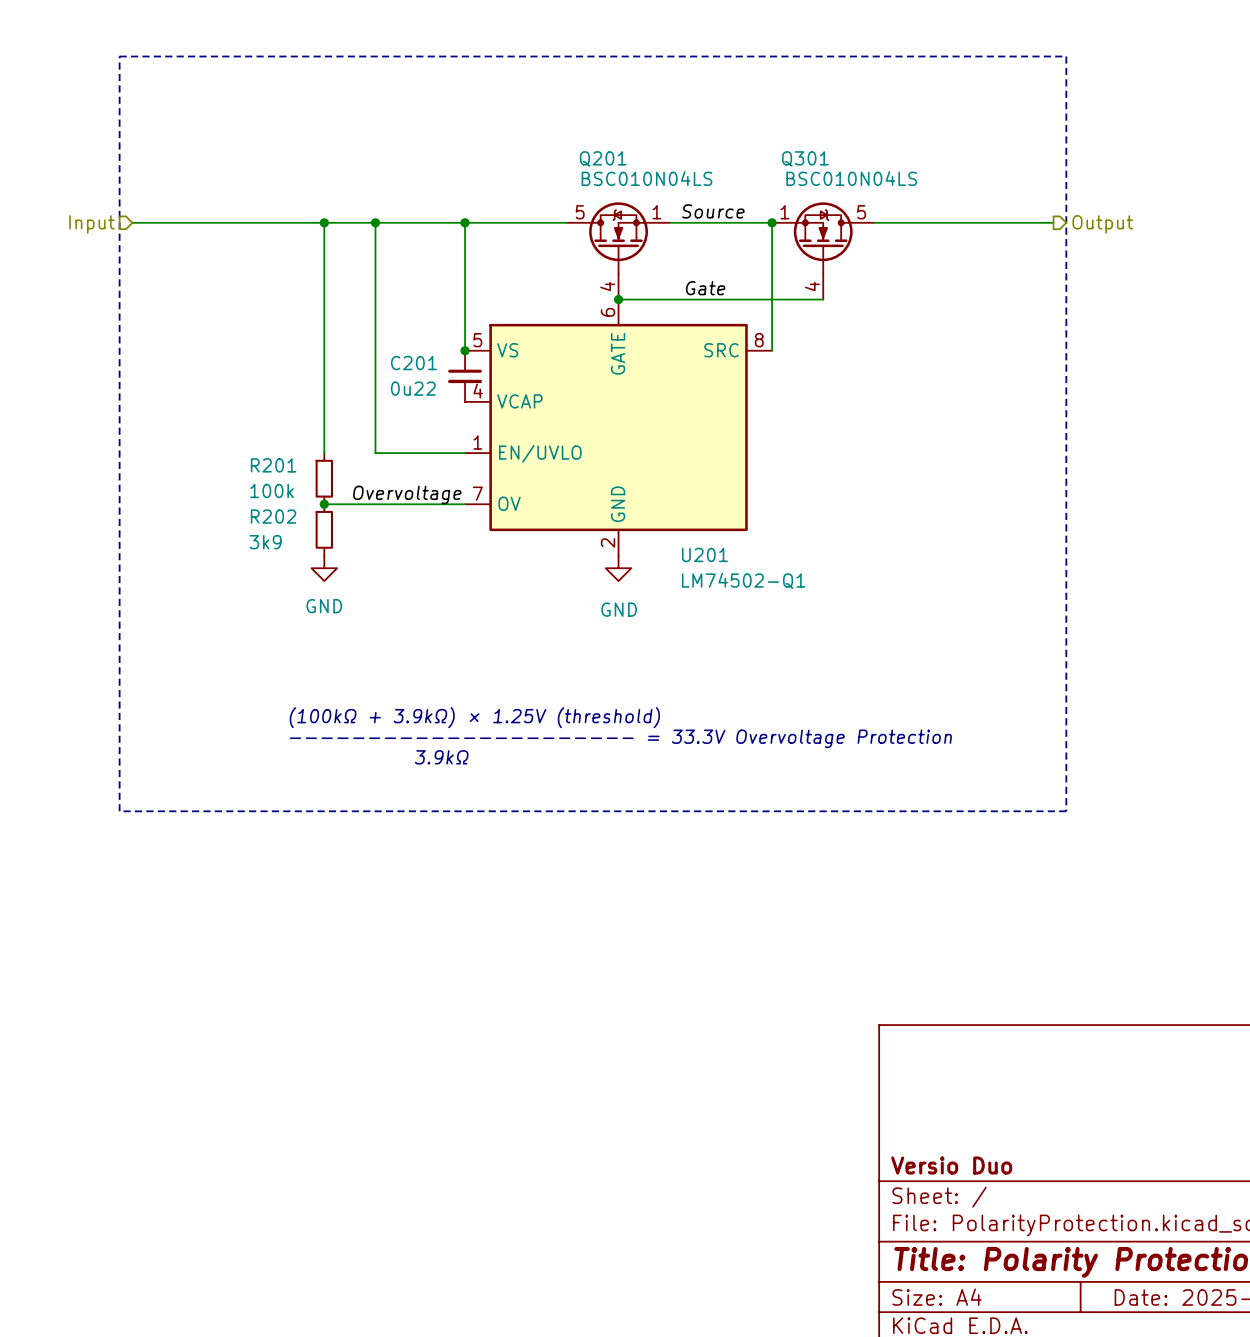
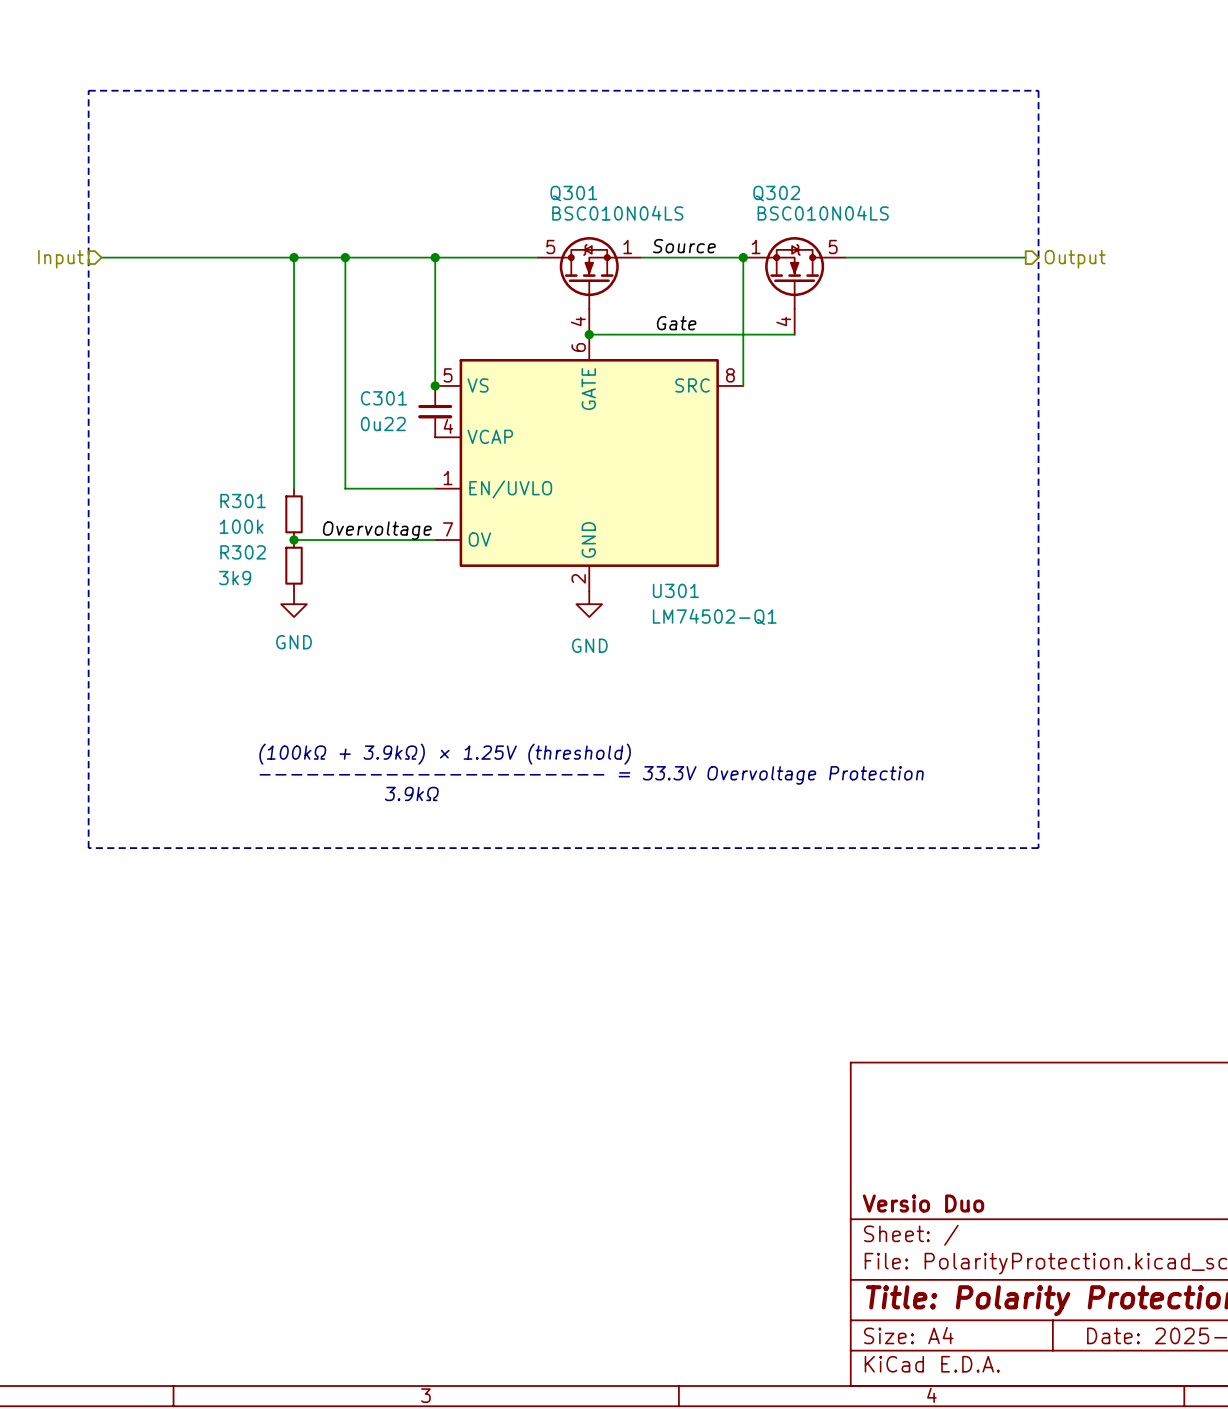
Q201 name: Q201 (603, 158) -> Q301 (573, 193)
Q301 name: Q301 (805, 158) -> Q302 (776, 193)
C201 name: C201 (413, 363) -> C301 (383, 398)
R201 name: R201 (273, 465) -> R301 (243, 501)
R202 name: R202 (273, 516) -> R302 (243, 552)
U201 name: U201 (704, 554) -> U301 (675, 590)

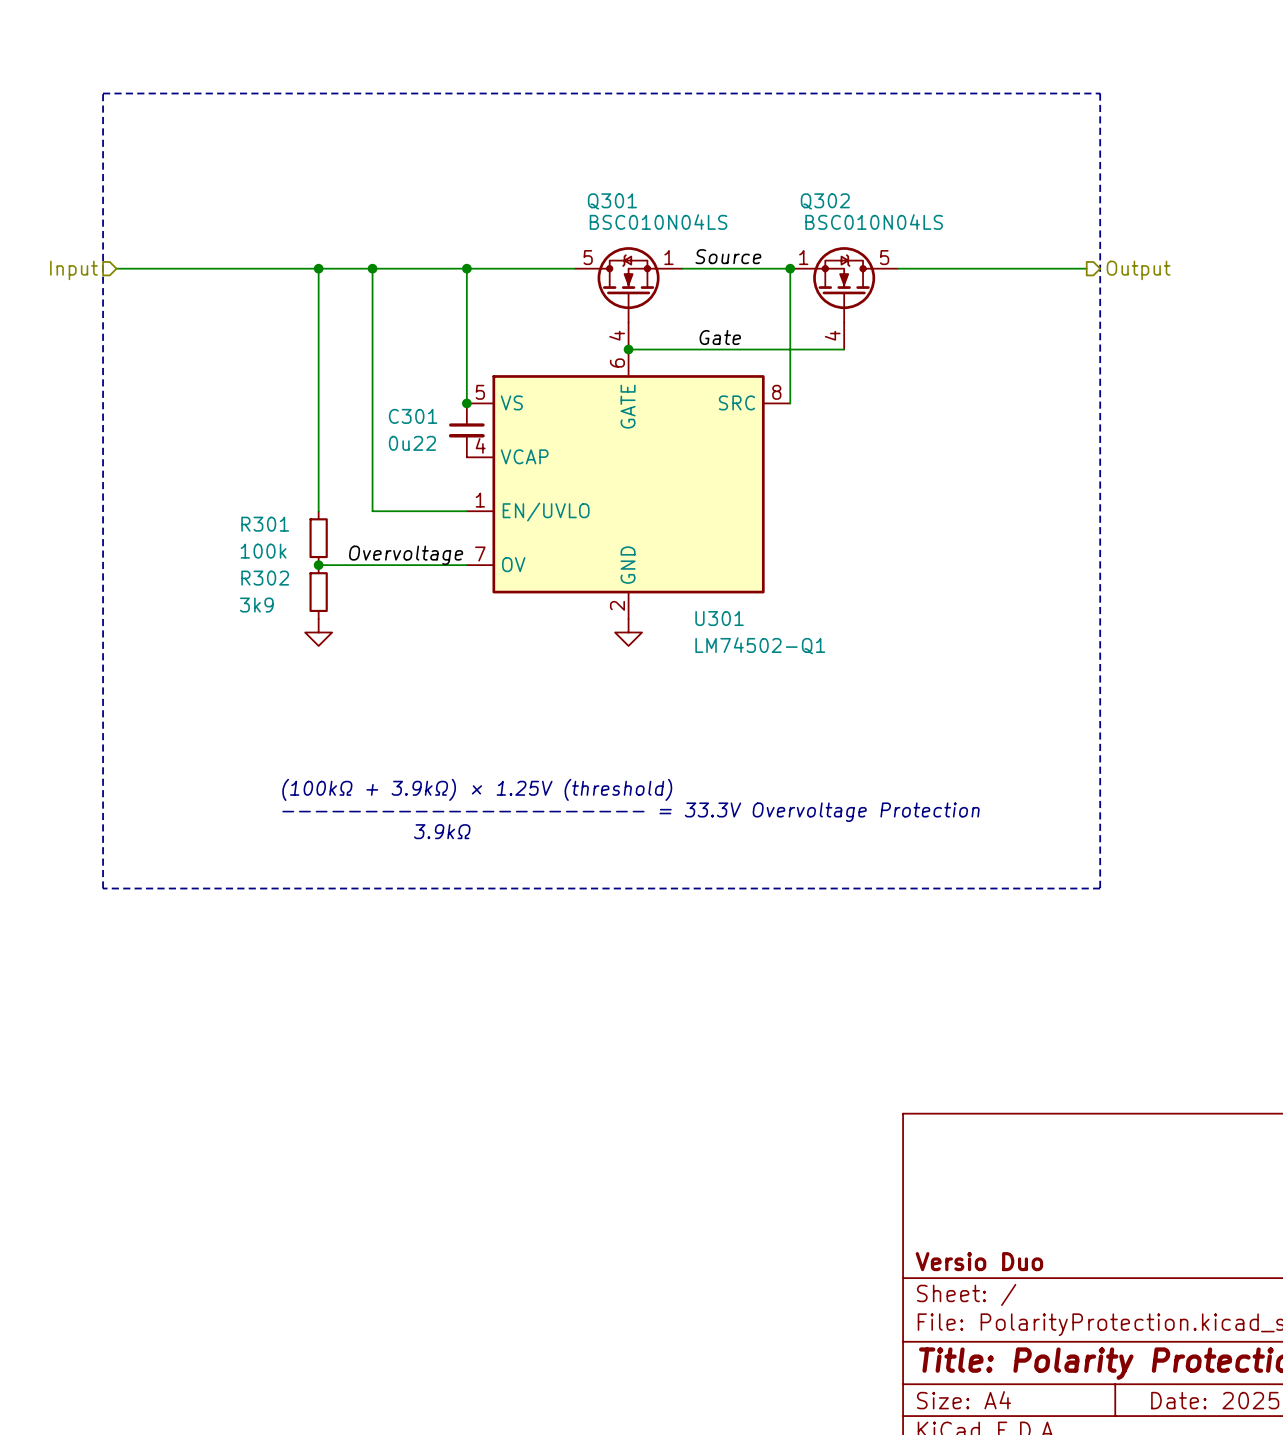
power symbol text: GND (294, 642) -> none
power symbol text: GND (589, 645) -> none

